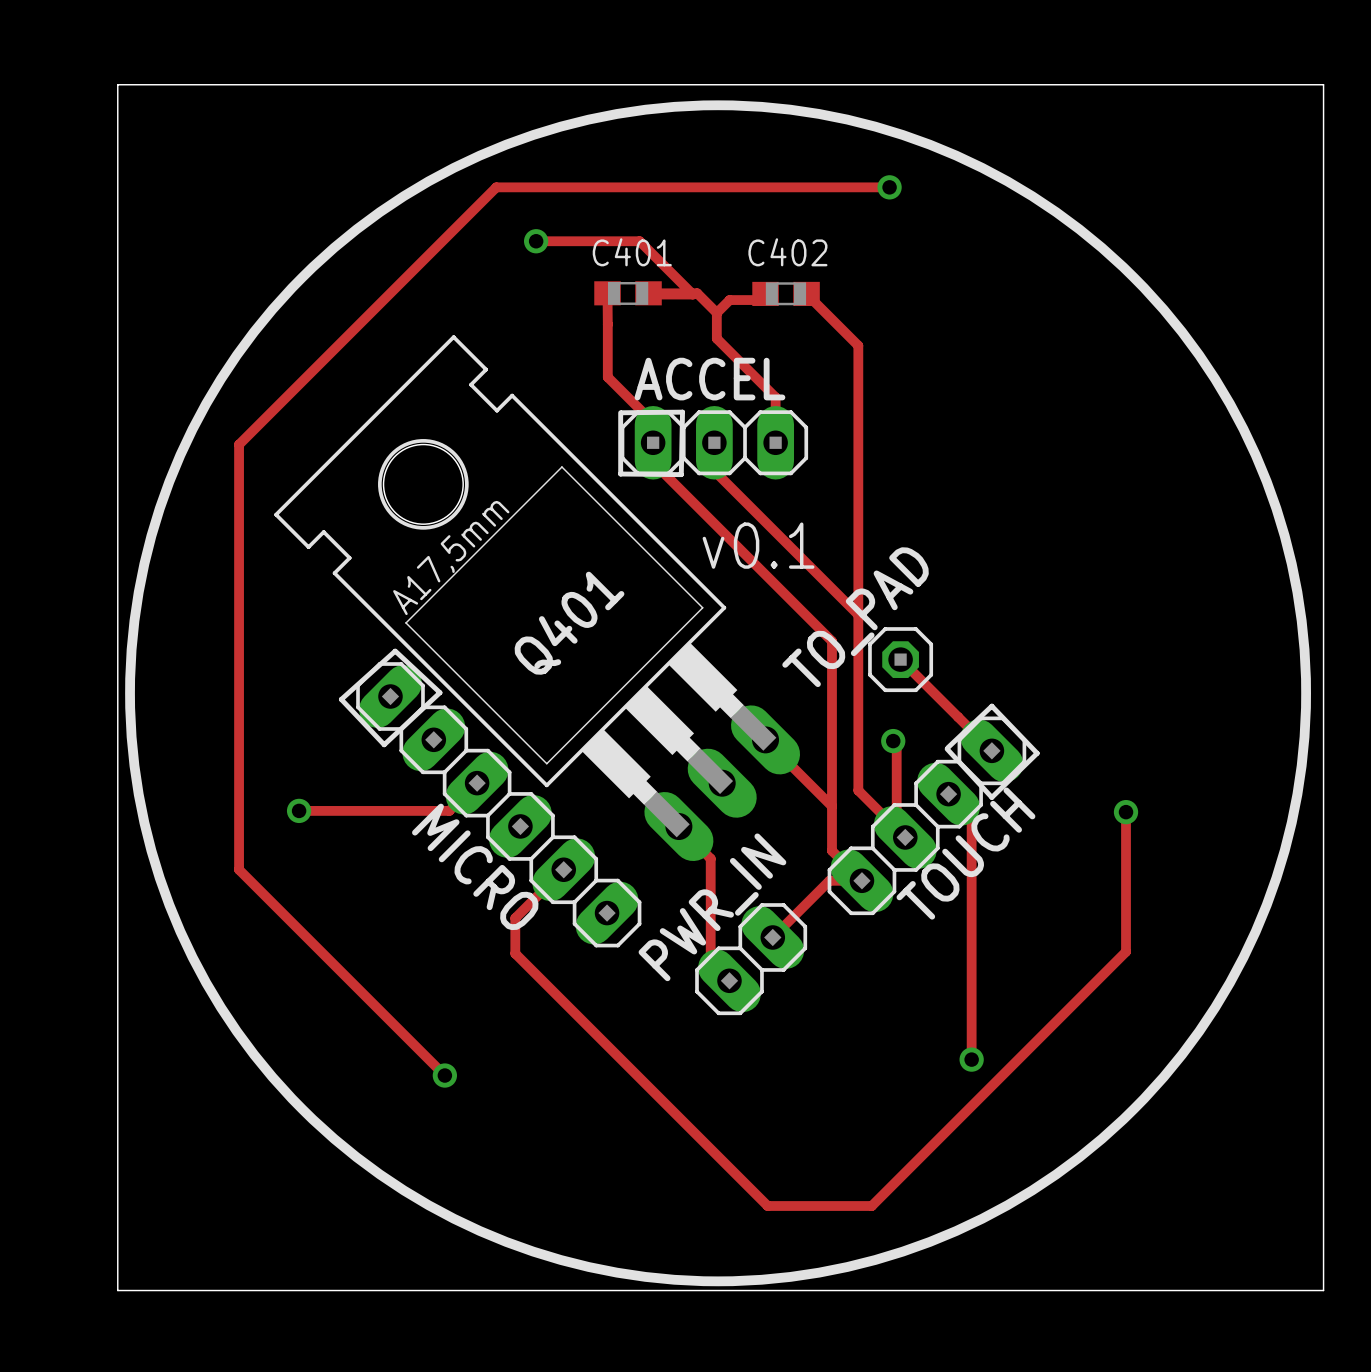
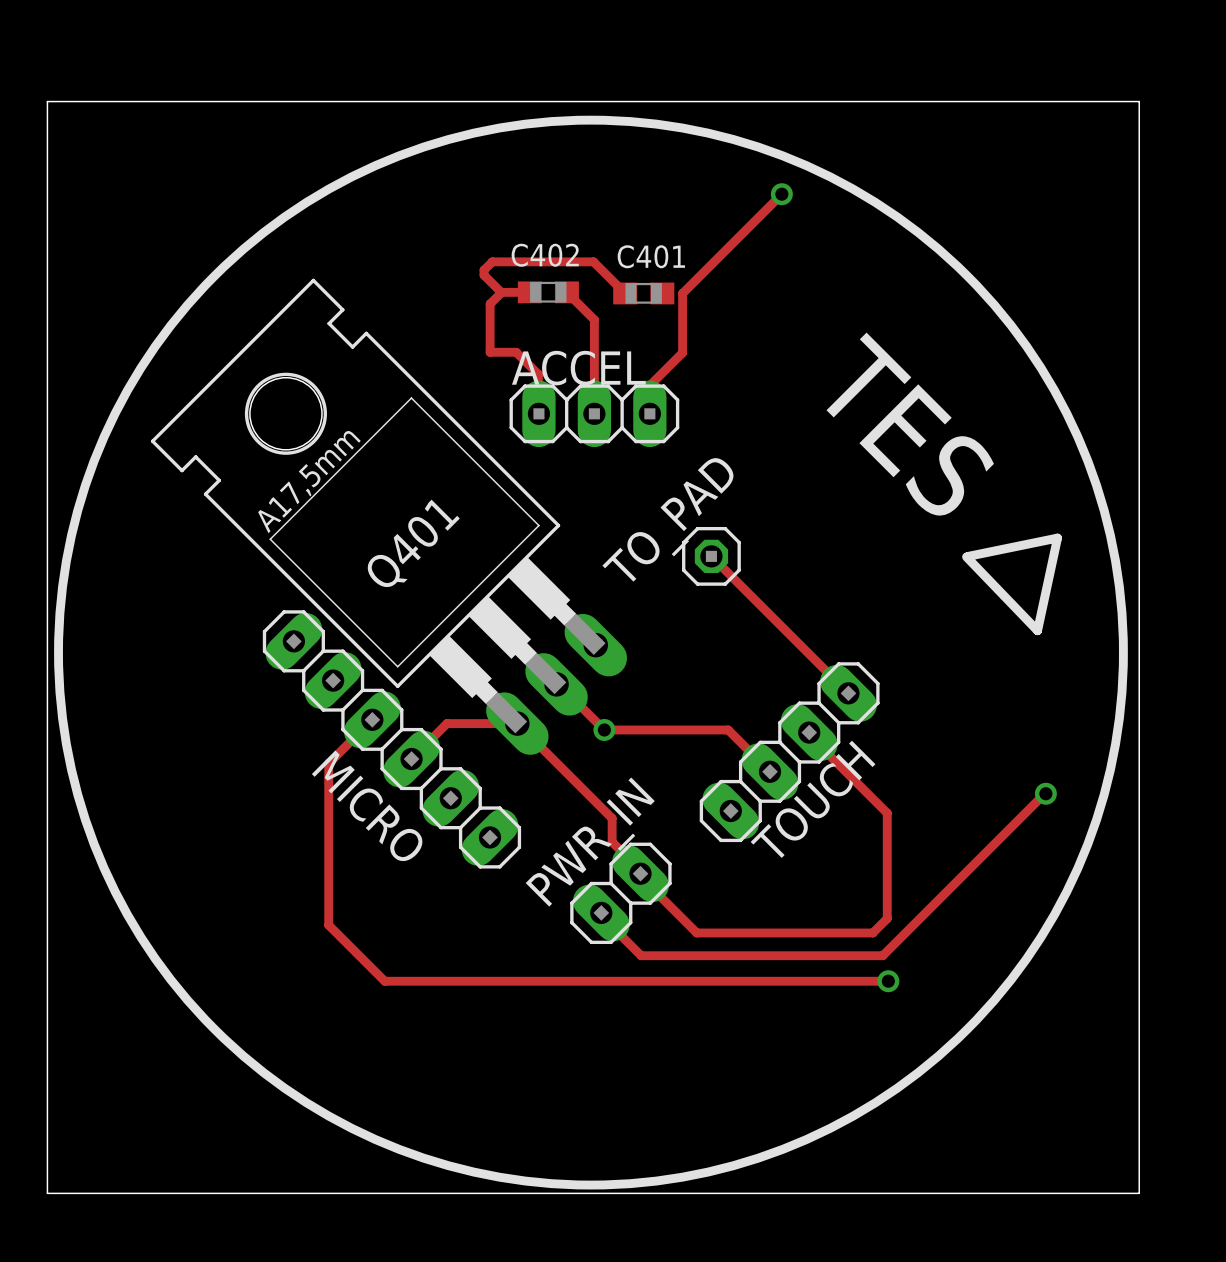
track: (889, 187) (496, 187) (239, 444) (239, 869) (444, 1075) -> none
via position: (889, 187) -> (781, 194)
track: none -> (781, 194) (682, 293) (682, 352) (649, 385) (649, 413)
track: (536, 241) (639, 241) (692, 294) (649, 294) (648, 293) (697, 293) (716, 312) -> none
via: (536, 241) -> none
track: (607, 293) (607, 377) (652, 421) (653, 462) (831, 641) (831, 850) (861, 880) (829, 880) (772, 937) -> none
C401 position: (628, 293) -> (643, 293)
track: (765, 293) (759, 300) (729, 300) (716, 312) -> none
C402 position: (786, 293) -> (548, 292)
track: (806, 293) (858, 345) (858, 790) (905, 837) -> none
track: none -> (501, 292) (490, 304) (490, 352) (516, 352) (538, 374) (538, 413)
track: none -> (529, 292) (501, 292) (484, 275) (484, 270) (492, 261) (593, 261) (625, 293)
track: none -> (566, 292) (594, 319) (594, 413)
track: (716, 312) (716, 338) (775, 397) (775, 442) -> none
line: (620, 412) (620, 474) (681, 474) (682, 412) (621, 412) -> none
track: (714, 442) (714, 470) (858, 614) -> none
ACCEL position: (714, 442) -> (594, 413)
text: none -> TES (910, 424)
text: v0.1 (758, 545) -> none
track: none -> (711, 556) (848, 693)
line: none -> (968, 556) (1057, 538) (1037, 630) (966, 556)
Q401 position: (537, 598) -> (388, 516)
line: (395, 651) (439, 692) (384, 744) (341, 699) (394, 651) -> none
track: (900, 659) (991, 750) -> none
TO_PAD position: (900, 659) -> (711, 556)
MICRO footprint: [356, 662, 642, 948] -> [262, 610, 522, 869]
track: none -> (556, 684) (558, 684) (604, 729) (728, 729) (770, 771)
track: (765, 739) (831, 806) -> none
track: (893, 741) (896, 744) (896, 828) -> none
via: (893, 741) -> none
line: (947, 747) (991, 706) (1037, 753) (991, 797) (947, 749) -> none
track: none -> (372, 719) (328, 763) (328, 925) (384, 981) (888, 981)
via: none -> (604, 729)
track: none -> (809, 732) (809, 735) (887, 813) (887, 918) (872, 932) (696, 932) (645, 881) (645, 875) (612, 842) (612, 818) (517, 723) (446, 723) (411, 759)
track: (477, 783) (449, 810) (299, 810) -> none
track: (948, 794) (971, 817) (971, 1059) -> none
via: (299, 810) -> none
track: (1126, 812) (1126, 951) (871, 1206) (767, 1206) (515, 953) (515, 918) (563, 869) -> none
via position: (1126, 812) -> (1045, 793)
TOUCH position: (926, 815) -> (789, 752)
track: (678, 826) (710, 858) (710, 956) (721, 966) (721, 972) (729, 980) -> none
track: none -> (1045, 793) (882, 955) (641, 955) (606, 920)
via position: (971, 1059) -> (888, 981)
via: (444, 1075) -> none

